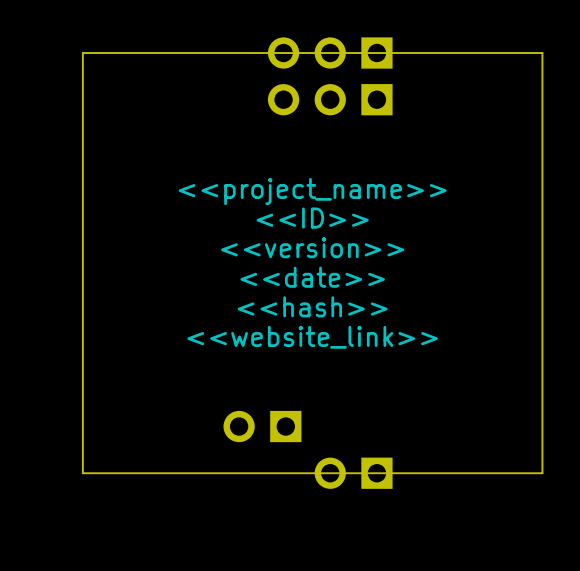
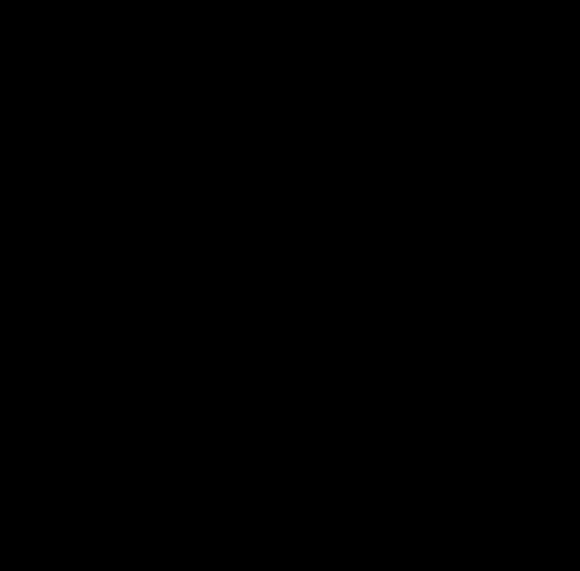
part: (330, 53) -> none
board edge: (542, 53) (82, 53) (82, 473) (542, 473) (542, 53) -> none
part: (330, 99) -> none
text: <<project_name>> (312, 191) -> none
text: <<ID>> (312, 218) -> none
text: <<version>> (312, 247) -> none
text: <<date>> (312, 277) -> none
text: <<hash>> (312, 306) -> none
text: <<website_link>> (312, 337) -> none
part: (262, 426) -> none
part: (353, 473) -> none

